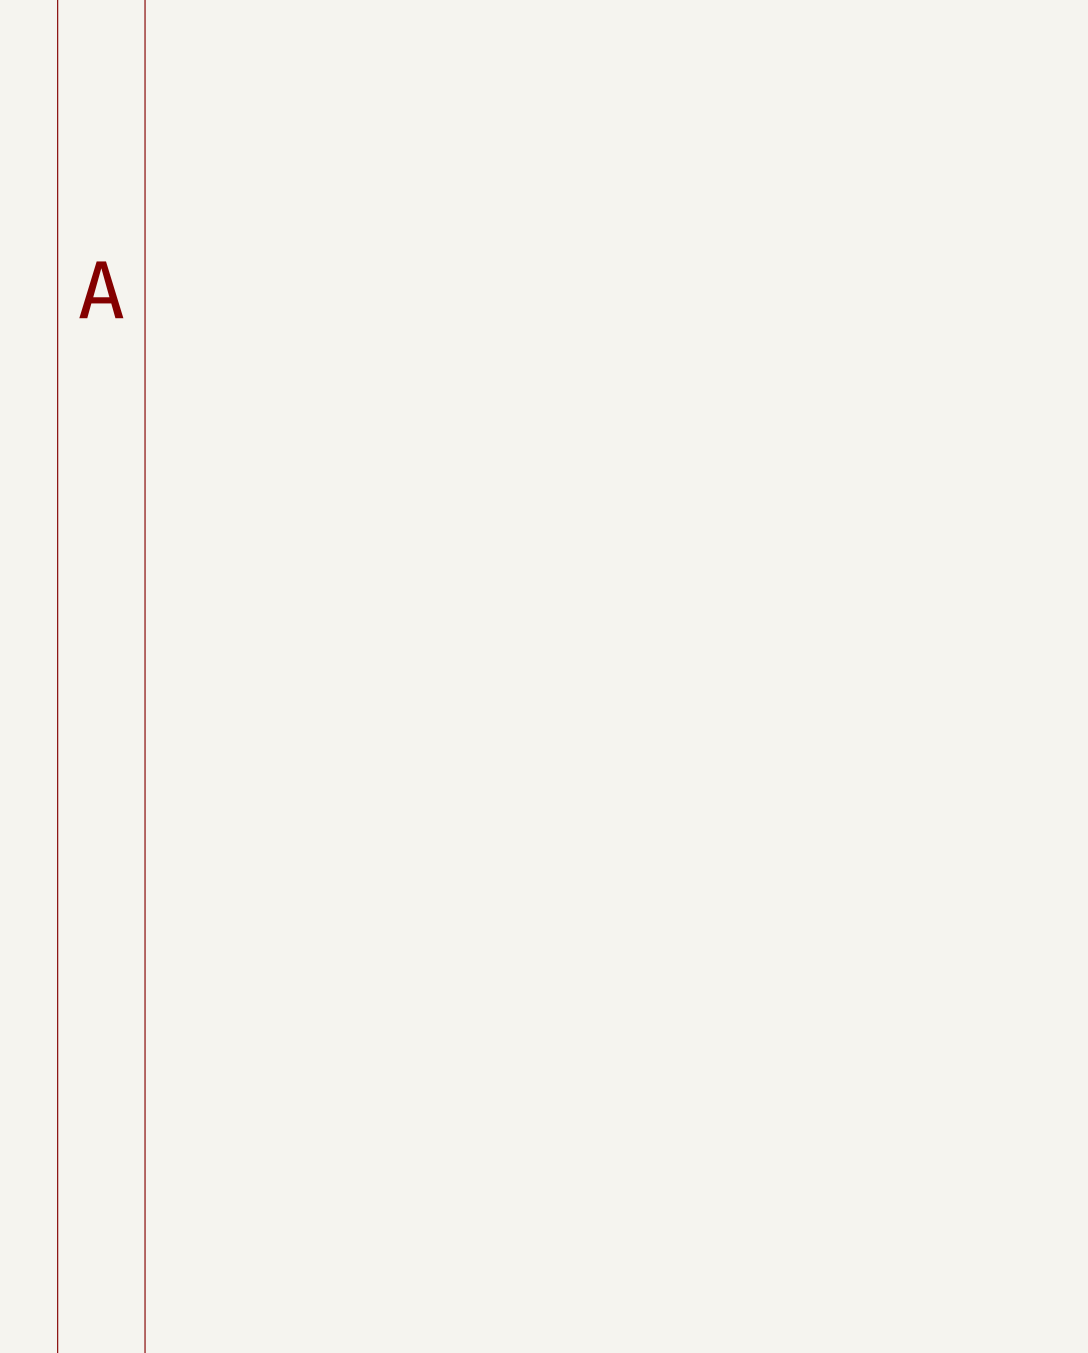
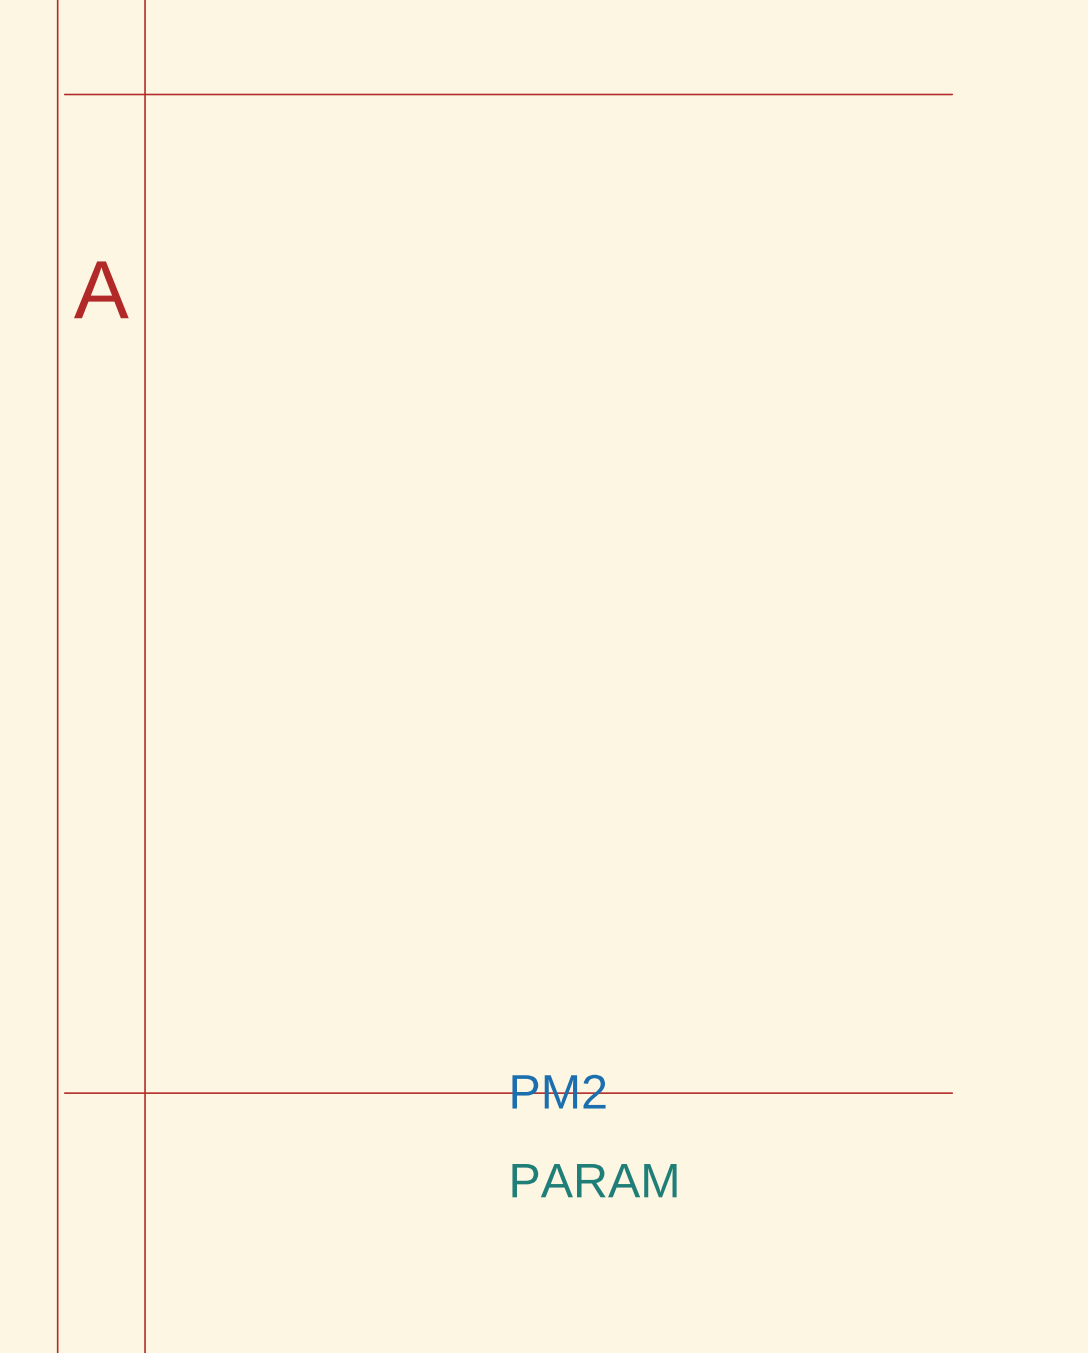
part: none -> (508, 94)
PM2: none -> PARAM (508, 1093)

